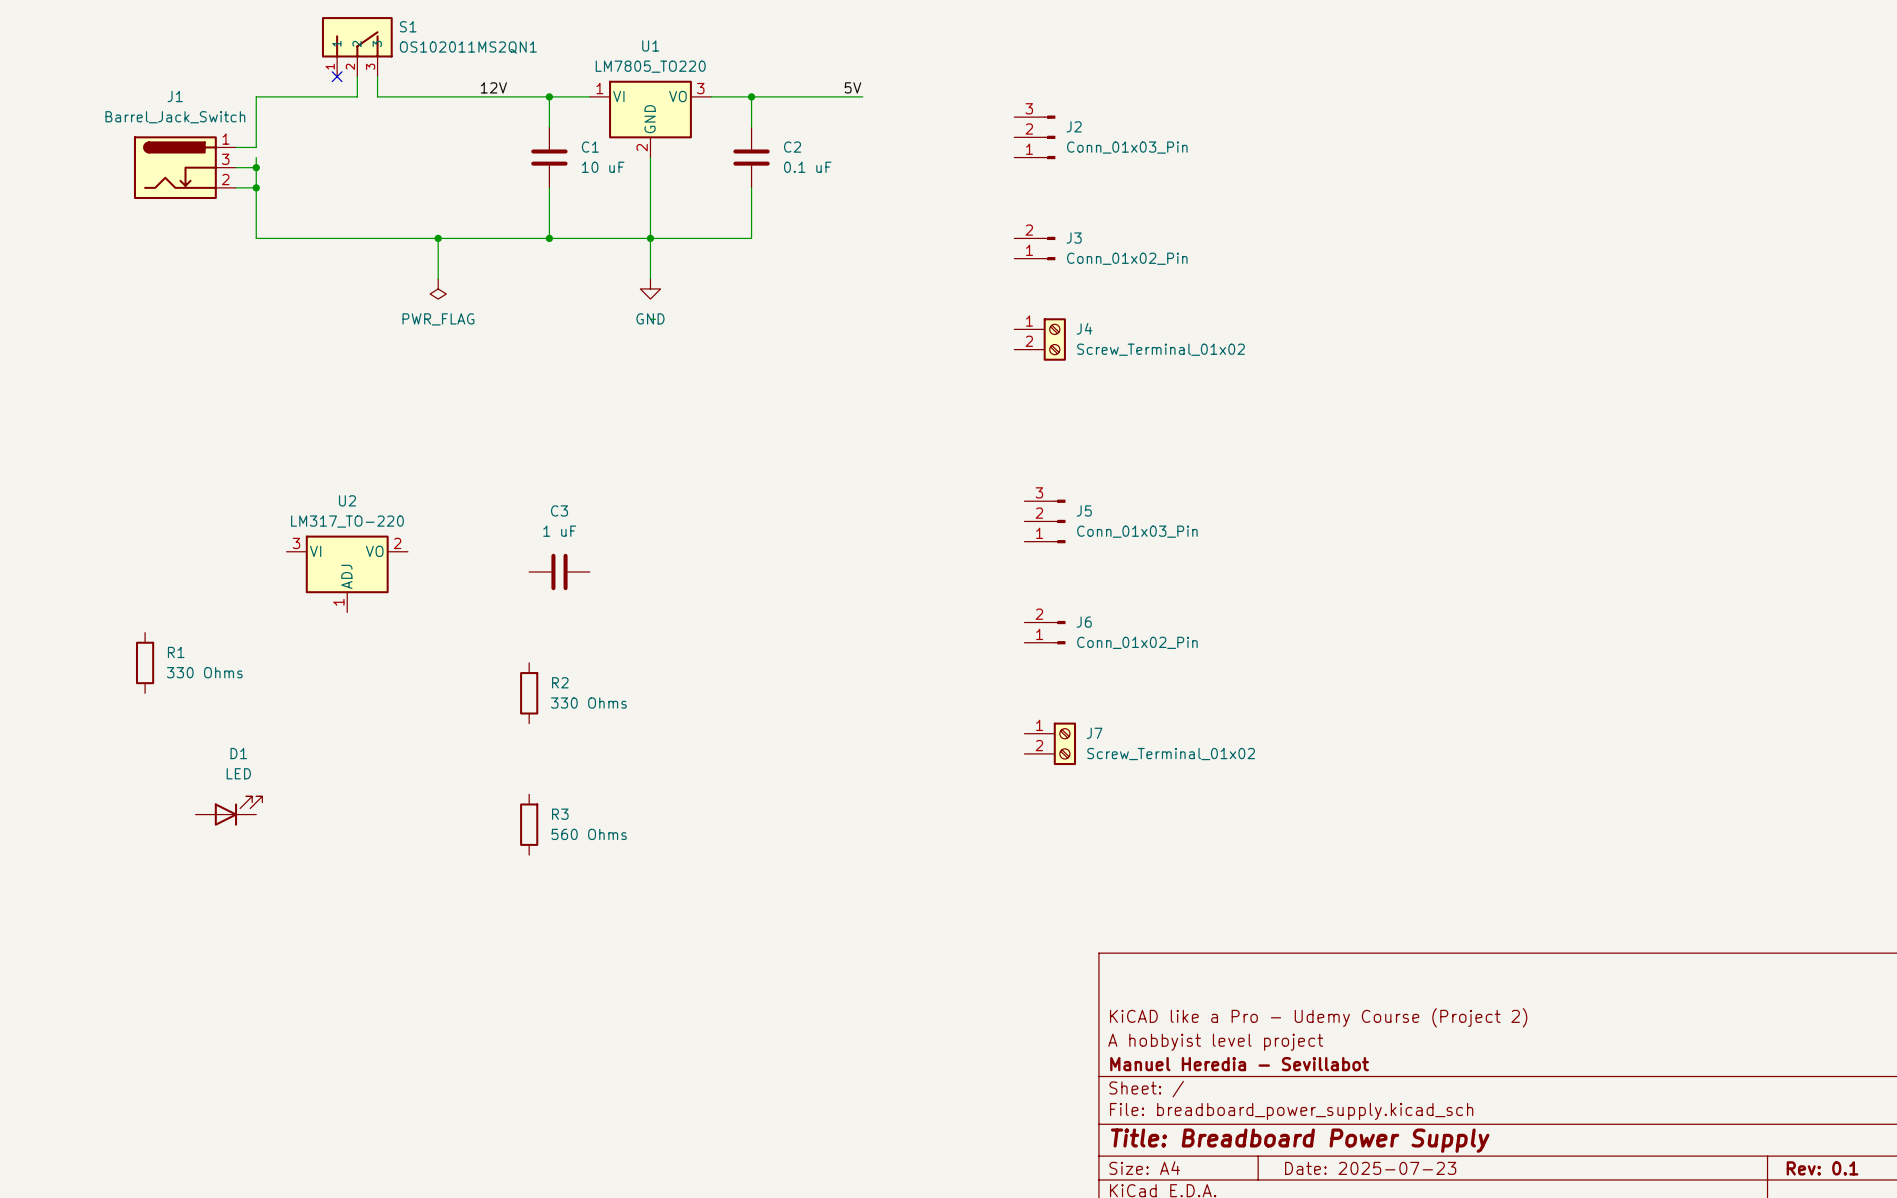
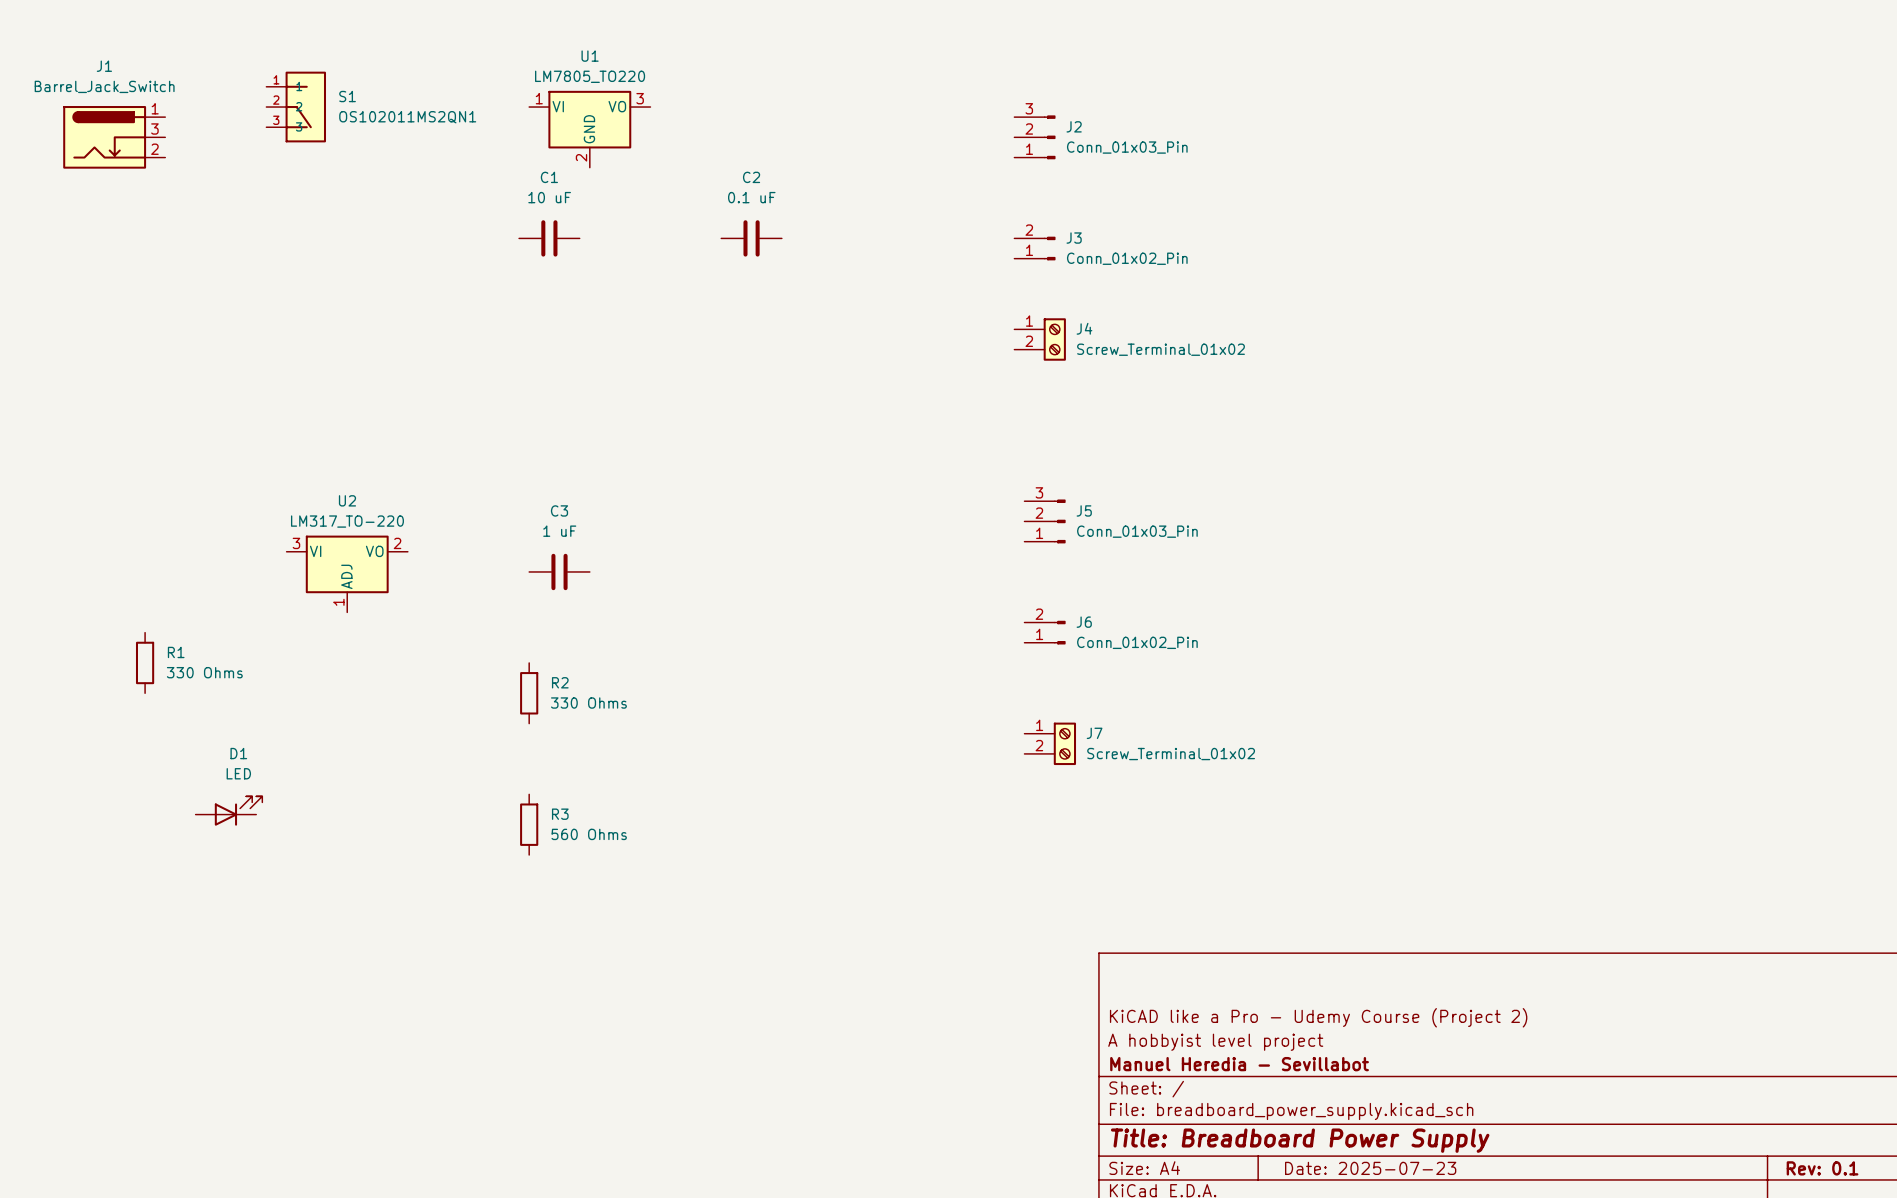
S1 rotation: 0° (357, 37) -> 90° clockwise (305, 107)
S1 position: (357, 46) -> (296, 107)
no-connect mark: (337, 76) -> none
wire: (357, 76) (357, 96) (256, 96) (256, 147) (236, 147) -> none
wire: (377, 76) (377, 96) (589, 96) -> none
label: 12V (493, 87) -> none
label: 5V (852, 87) -> none
junction: (549, 96) -> none
wire: (711, 96) (862, 96) -> none
wire: (751, 96) (751, 127) -> none
junction: (751, 96) -> none
U1 position: (650, 119) -> (589, 129)
C1 name position: C1 (590, 147) -> C1 (549, 177)
C2 name position: C2 (792, 147) -> C2 (751, 177)
wire: (256, 157) (256, 238) (751, 238) (751, 187) -> none
C1 rotation: 0° (549, 157) -> 90° clockwise (549, 238)
C1 position: (549, 157) -> (549, 238)
wire: (650, 157) (650, 278) -> none
C2 rotation: 0° (751, 157) -> 90° clockwise (751, 238)
C2 position: (751, 157) -> (751, 238)
J1 position: (184, 167) -> (114, 137)
wire: (236, 167) (256, 167) -> none
junction: (256, 167) -> none
C1 value position: 10 uF (603, 167) -> 10 uF (549, 197)
C2 value position: 0.1 uF (807, 167) -> 0.1 uF (751, 197)
wire: (236, 187) (256, 187) -> none
junction: (256, 187) -> none
wire: (549, 187) (549, 238) -> none
wire: (438, 238) (438, 278) -> none
junction: (438, 238) -> none
junction: (549, 238) -> none
junction: (650, 238) -> none
power symbol: PWR_FLAG (438, 288) -> none
power symbol: GND (650, 288) -> none
wire: (650, 319) (655, 319) -> none

